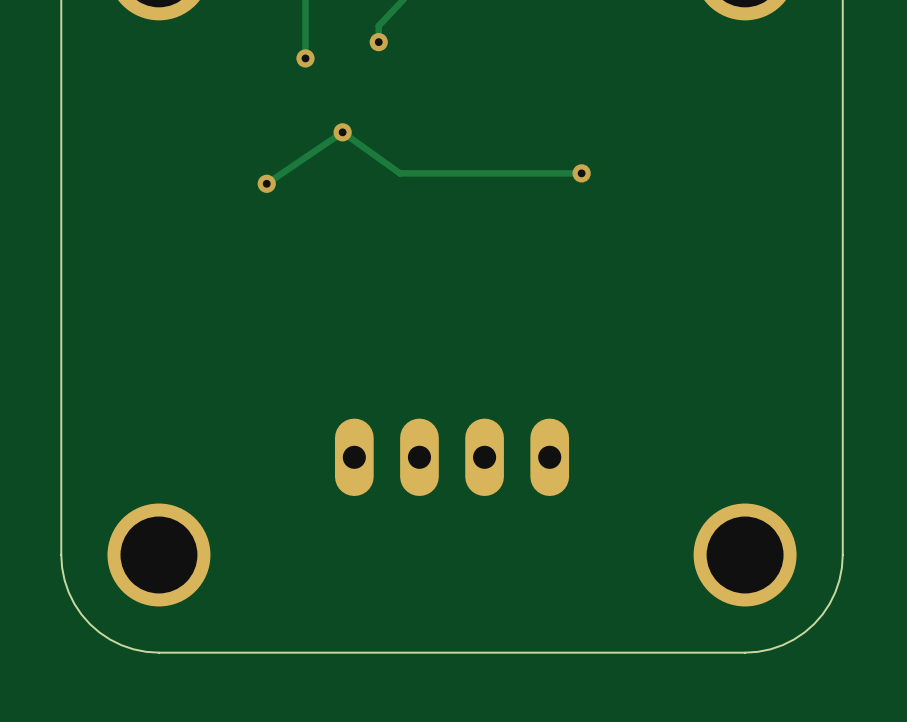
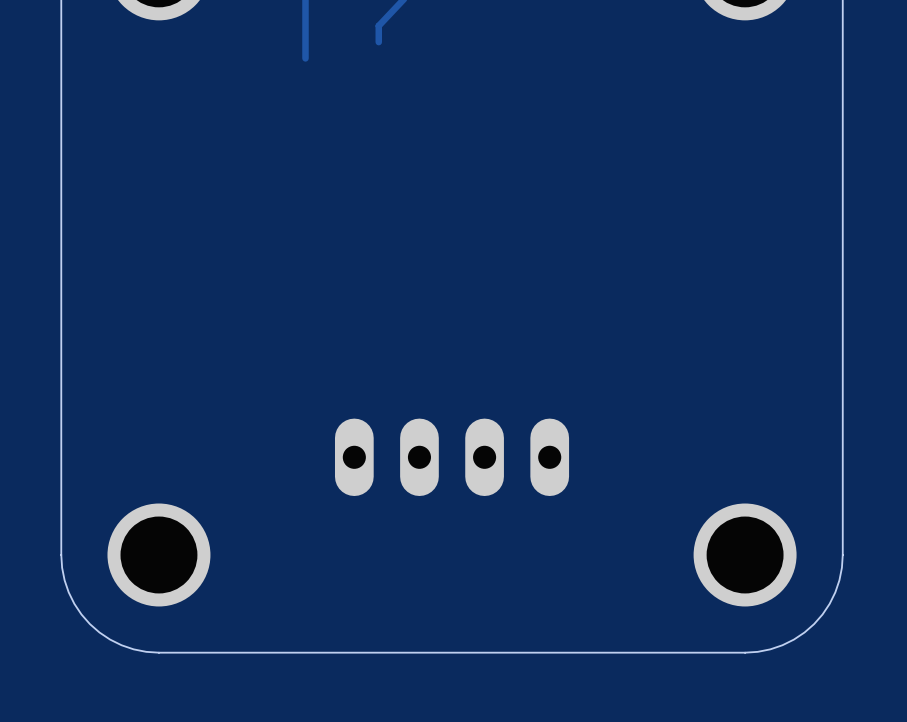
via: (378, 42) -> none
via: (305, 58) -> none
via: (342, 132) -> none
track: (581, 173) (399, 173) (342, 132) (266, 183) -> none
via: (581, 173) -> none
via: (266, 183) -> none

